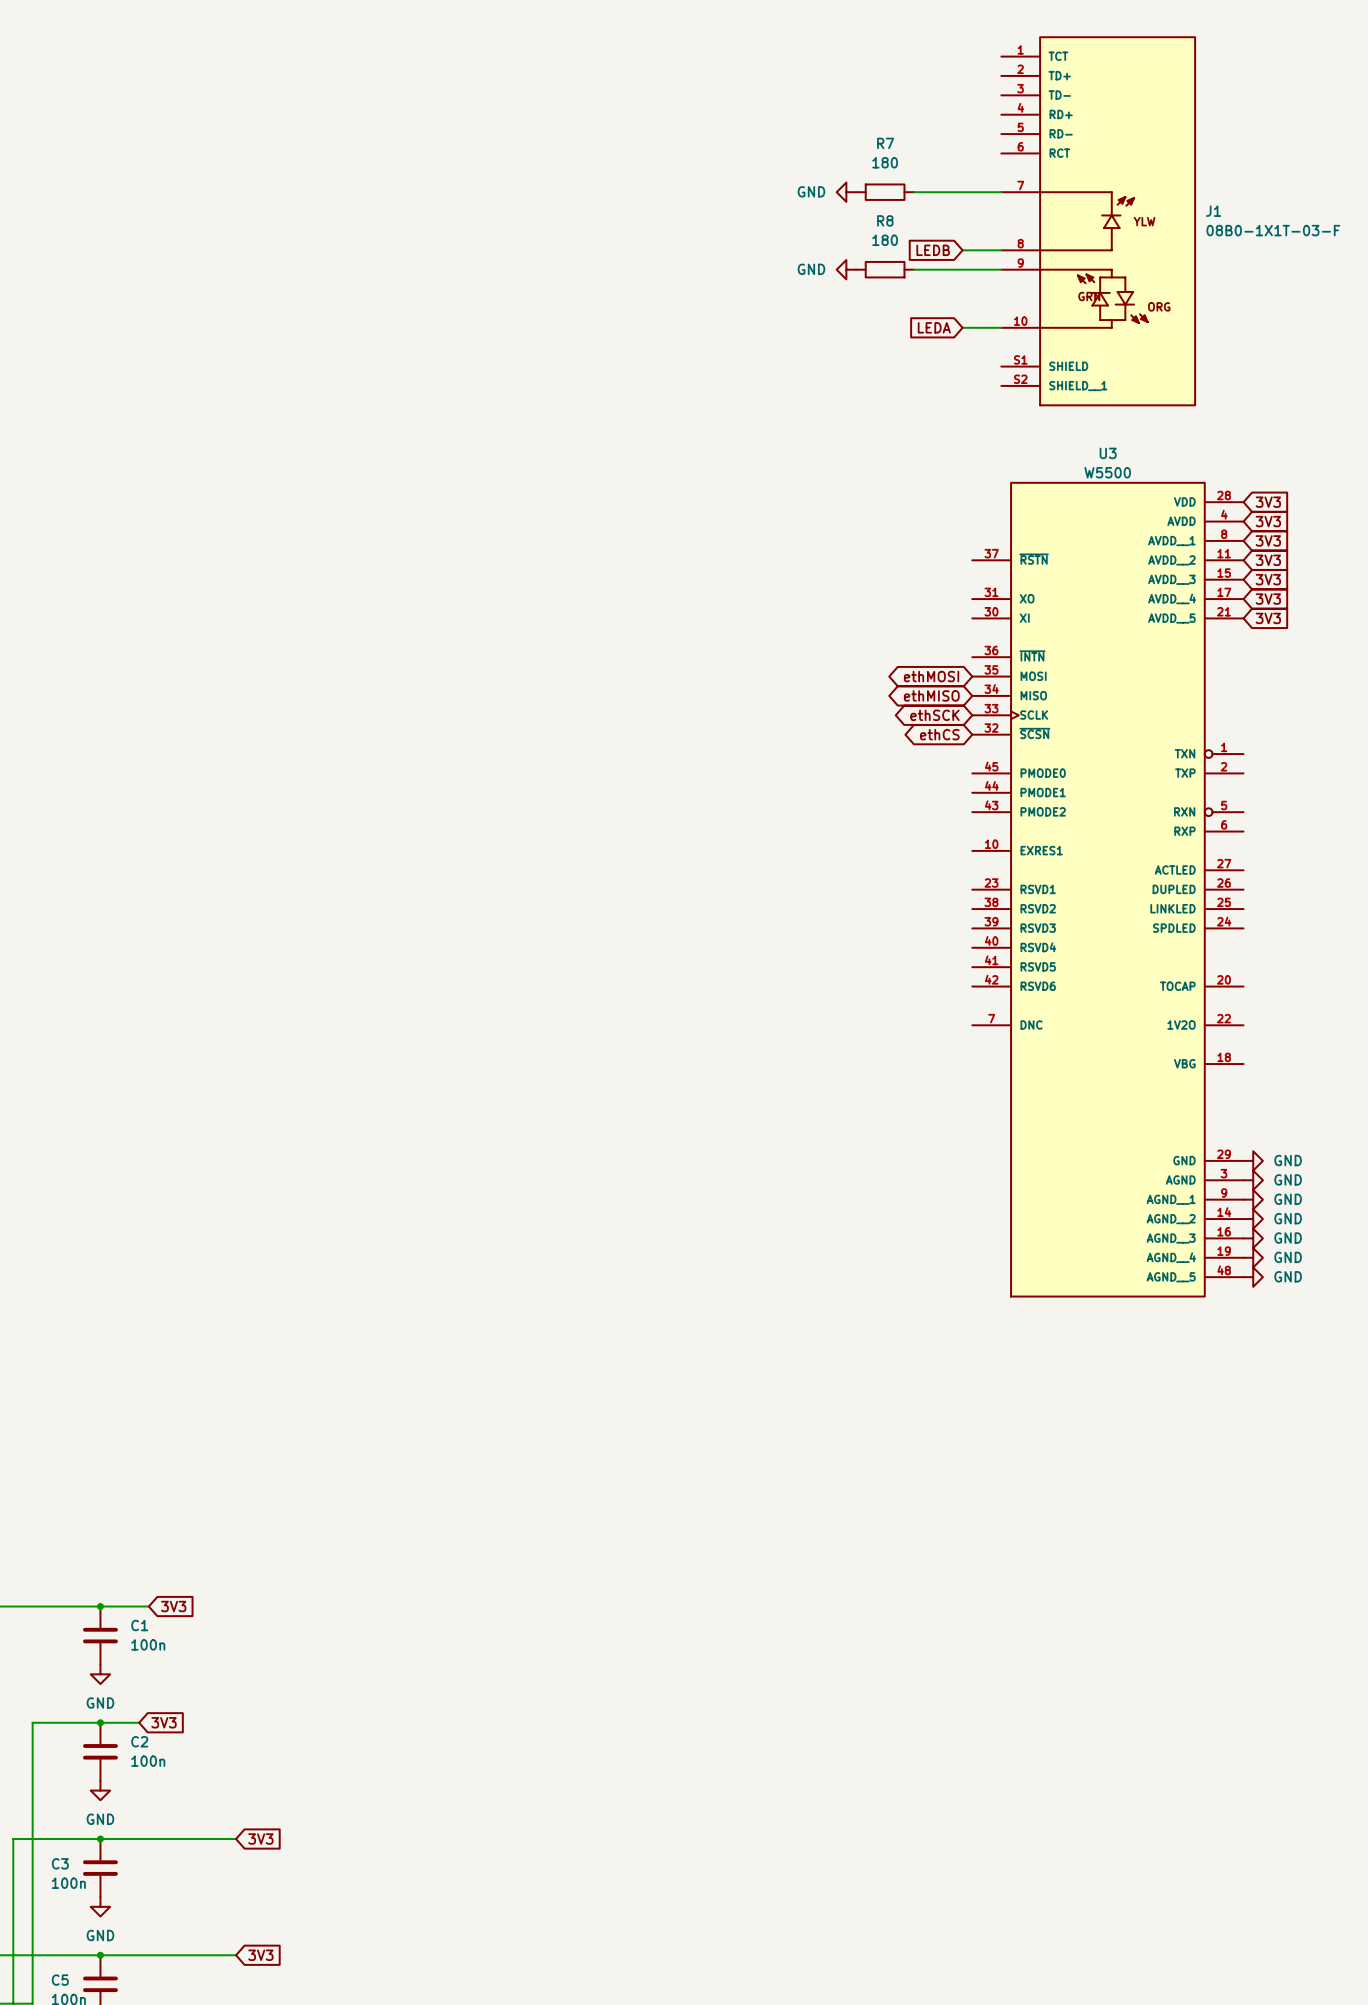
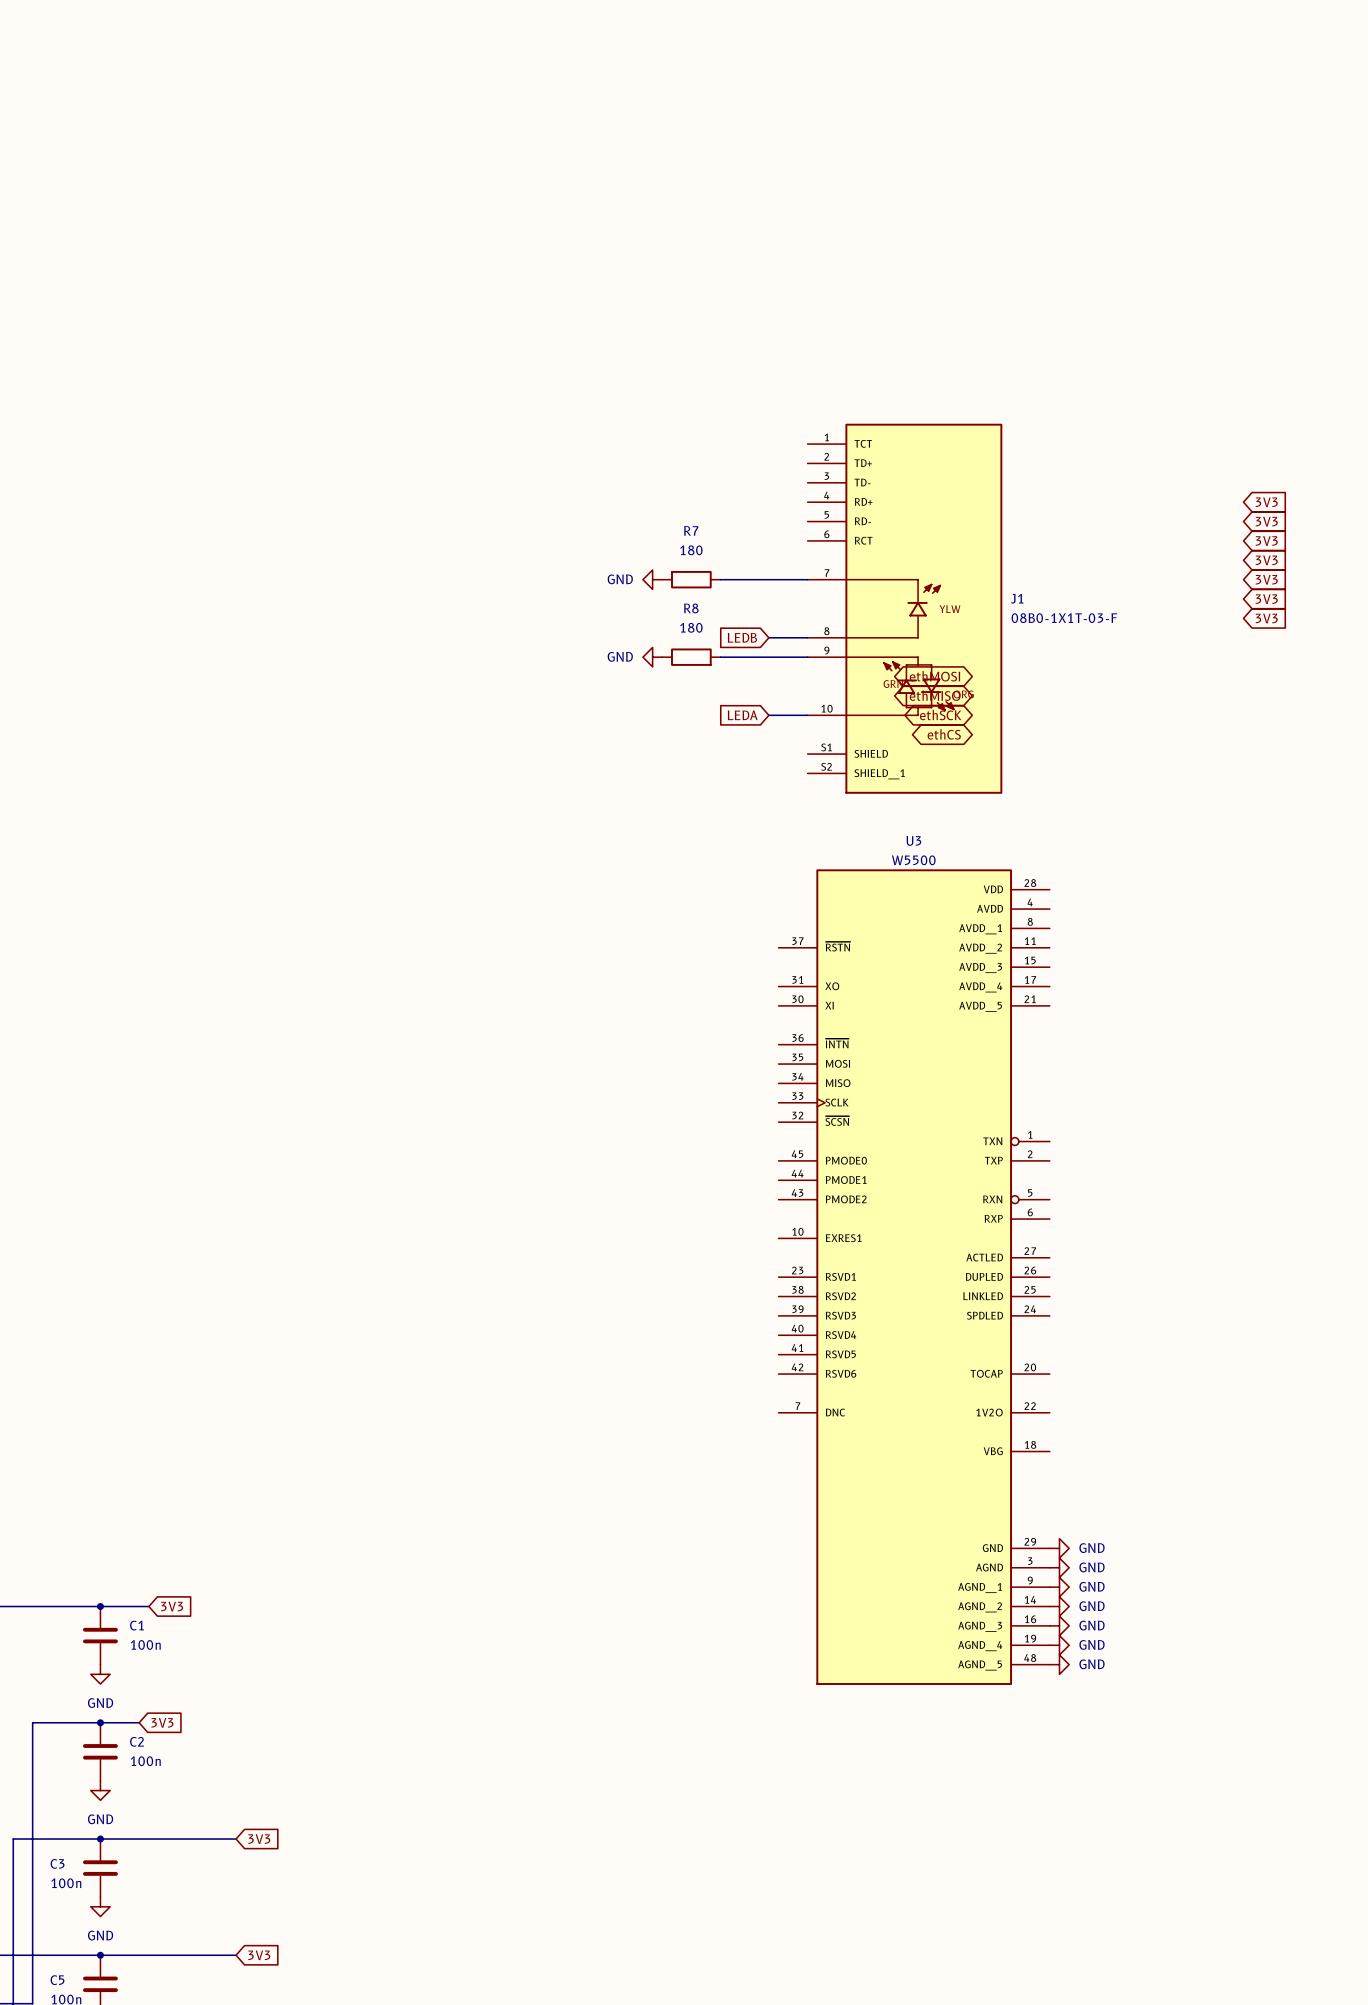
power symbol: GND (846, 192) -> none
R7 position: (885, 192) -> (691, 579)
wire: (914, 192) (1001, 192) -> none
J1 position: (1098, 221) -> (904, 608)
global label: LEDB (933, 250) -> none
wire: (962, 250) (1001, 250) -> none
power symbol: GND (846, 269) -> none
R8 position: (885, 269) -> (691, 657)
wire: (914, 269) (1001, 269) -> none
global label: LEDA (934, 327) -> none
wire: (962, 327) (1001, 327) -> none
power symbol: none -> GND (652, 579)
wire: none -> (720, 579) (807, 579)
global label: none -> LEDB (742, 637)
wire: none -> (768, 637) (807, 637)
power symbol: none -> GND (652, 657)
wire: none -> (720, 657) (807, 657)
global label: none -> LEDA (742, 715)
wire: none -> (768, 715) (807, 715)
U3 position: (1107, 889) -> (914, 1277)
power symbol: GND (1253, 1160) -> none
power symbol: GND (1253, 1180) -> none
power symbol: GND (1253, 1199) -> none
power symbol: GND (1253, 1219) -> none
power symbol: GND (1253, 1238) -> none
power symbol: GND (1253, 1257) -> none
power symbol: GND (1253, 1277) -> none
power symbol: none -> GND (1059, 1548)
power symbol: none -> GND (1059, 1567)
power symbol: none -> GND (1059, 1587)
power symbol: none -> GND (1059, 1606)
power symbol: none -> GND (1059, 1625)
power symbol: none -> GND (1059, 1645)
power symbol: none -> GND (1059, 1664)

